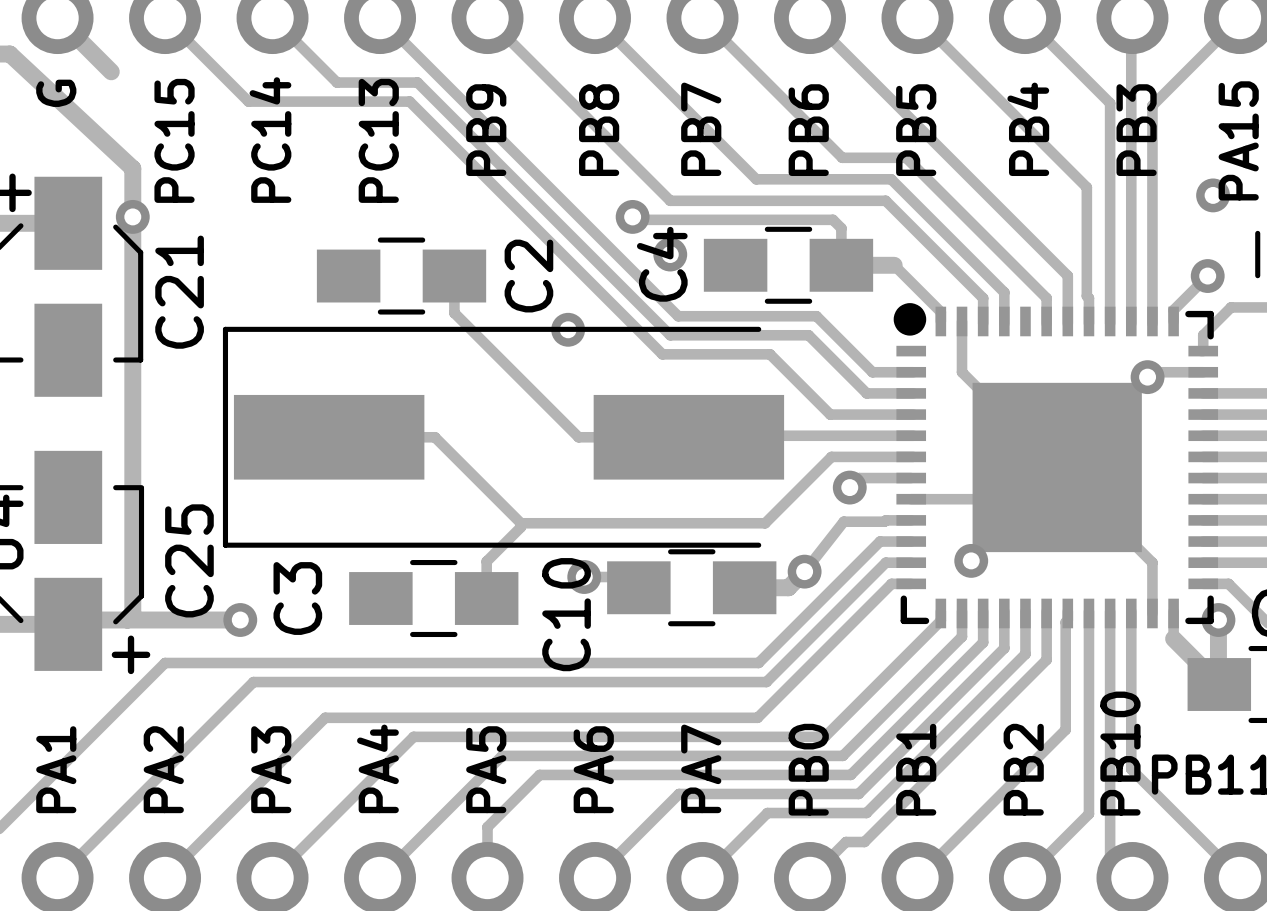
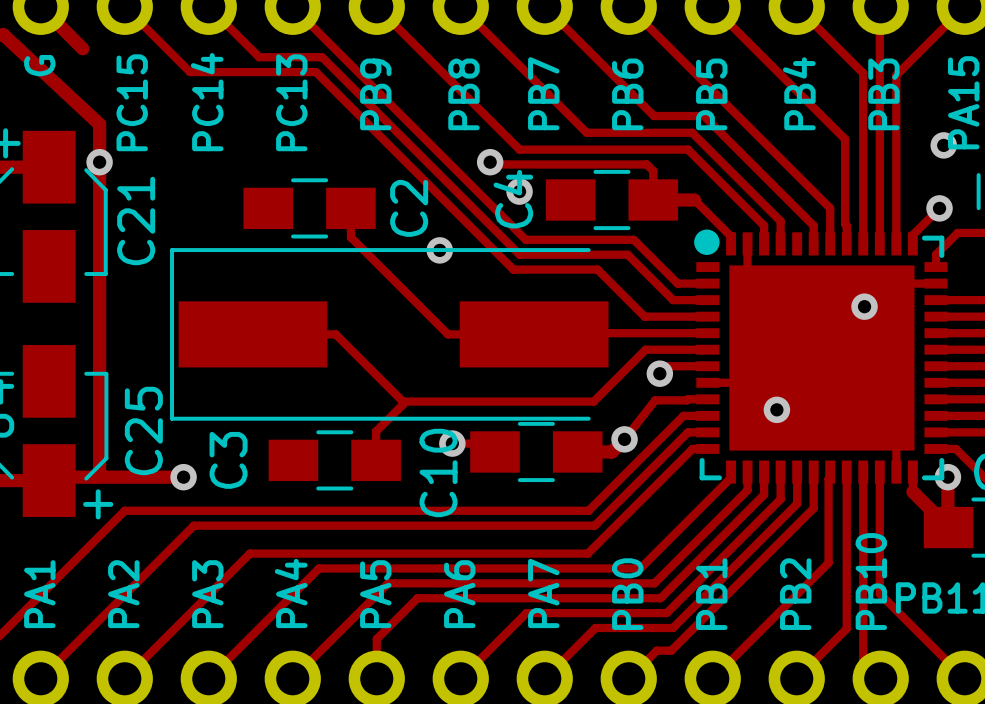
part footprint: [893, 303, 1219, 629] -> [694, 229, 948, 484]
via position: (1147, 377) -> (864, 306)
via position: (971, 560) -> (776, 409)

